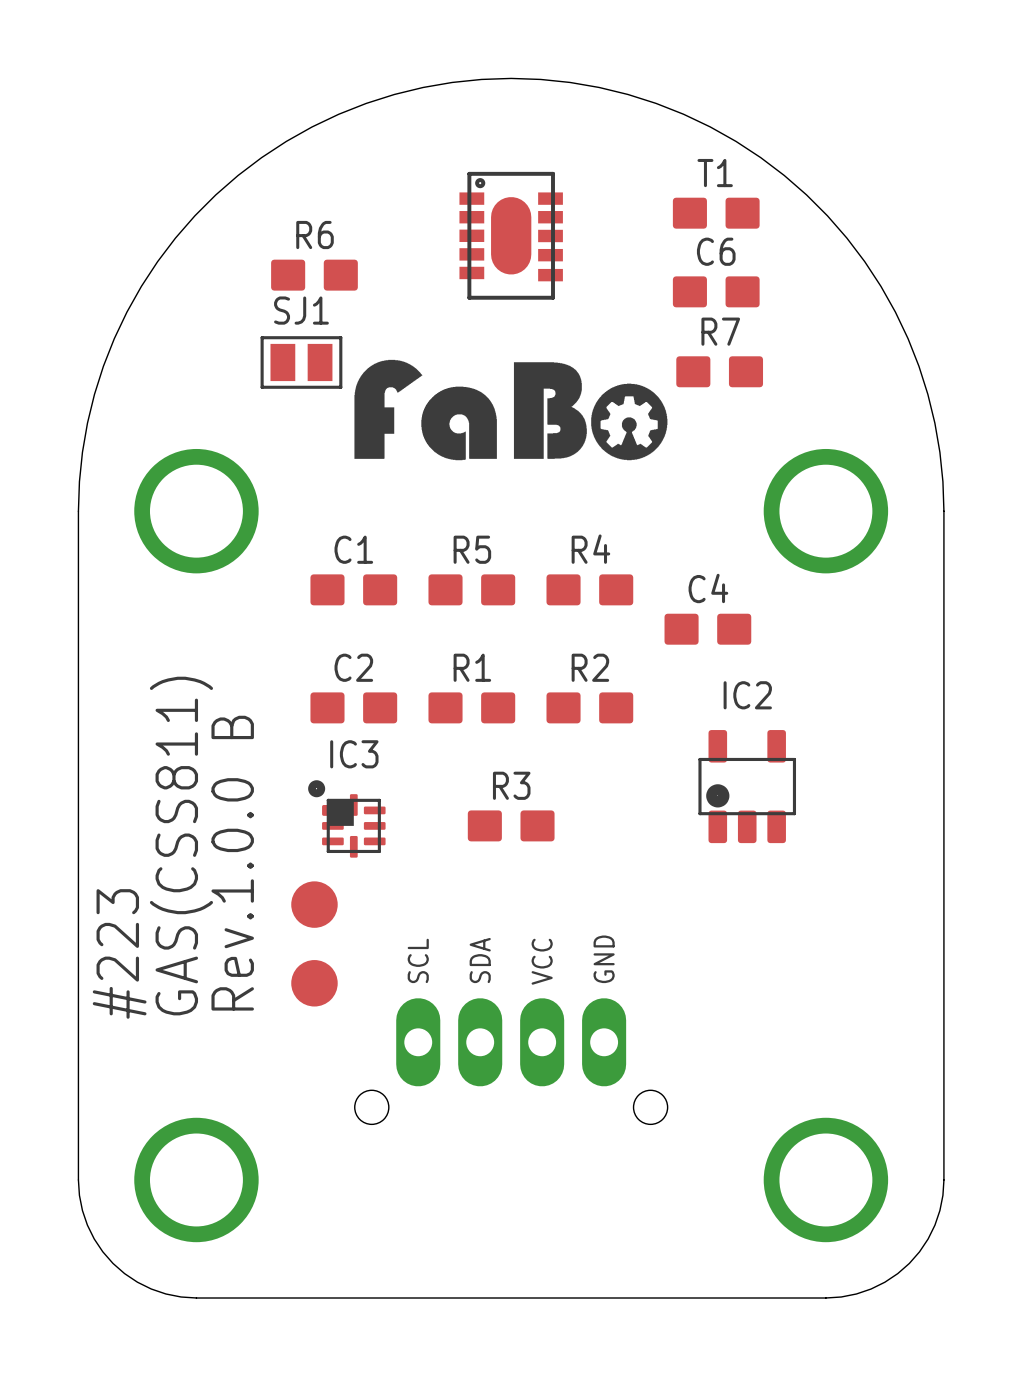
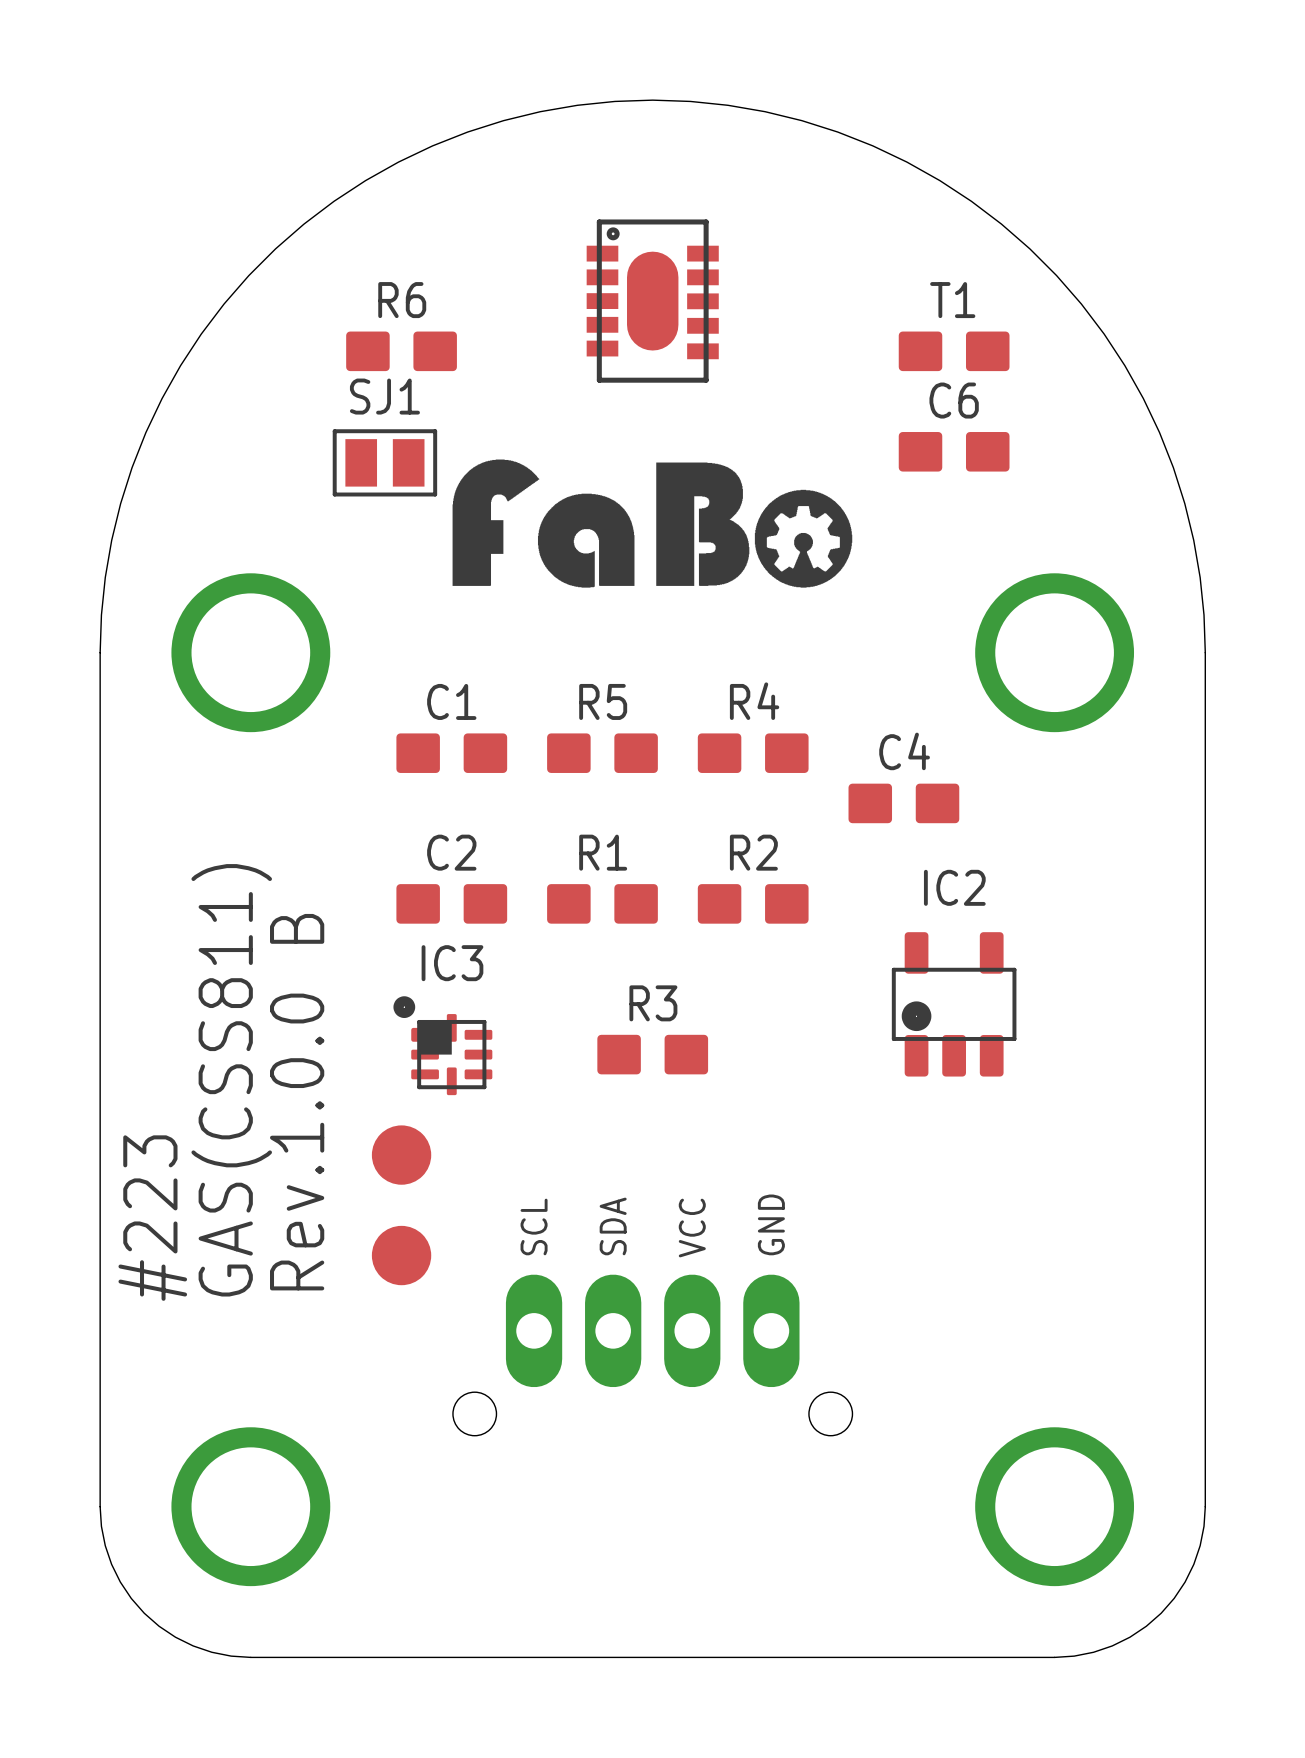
T1 position: (716, 213) -> (954, 351)
C6 position: (716, 291) -> (954, 451)
R7: (719, 371) -> none

